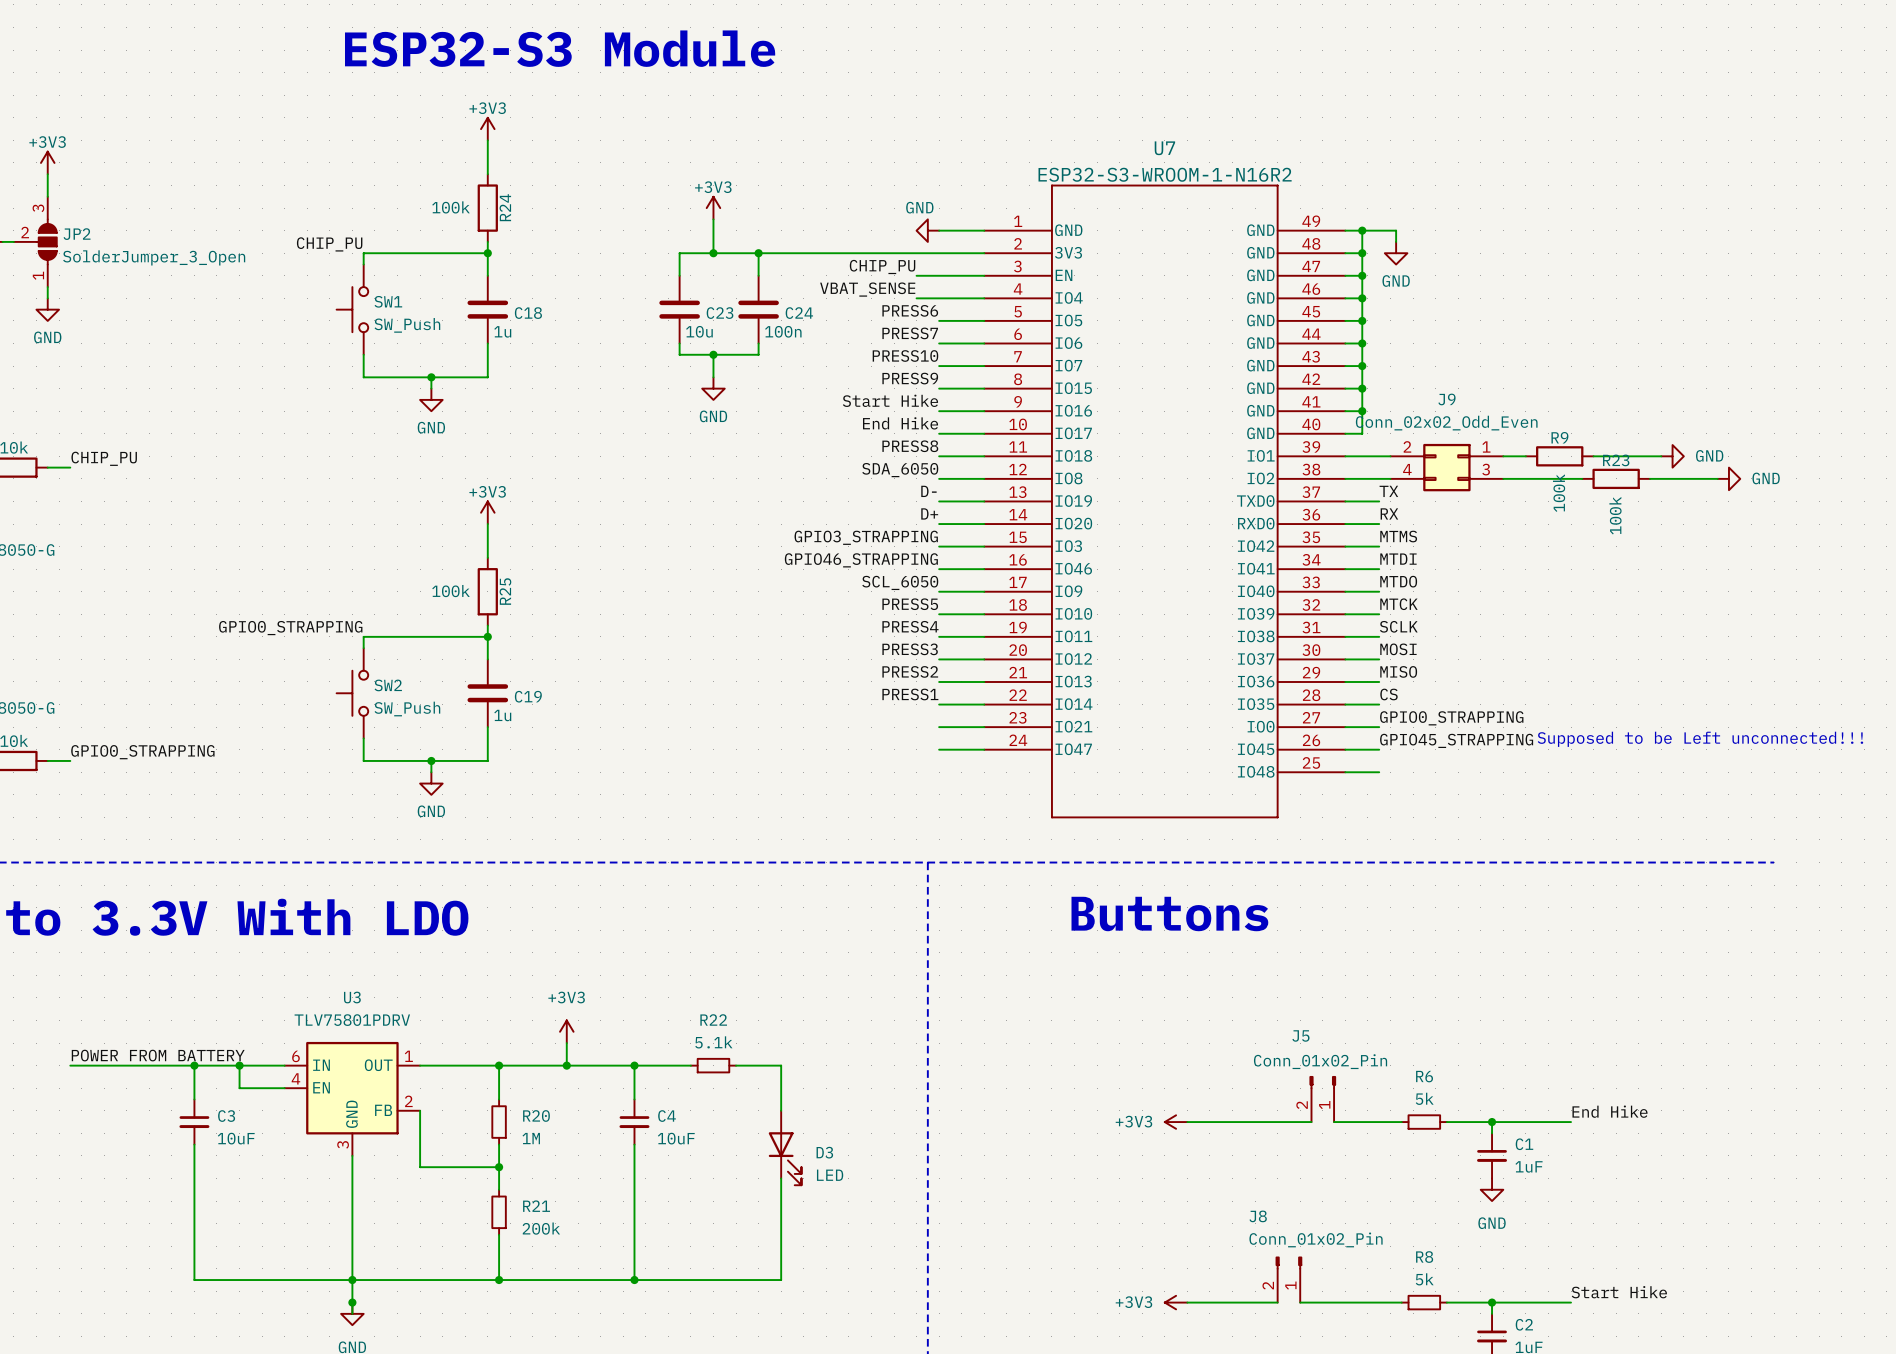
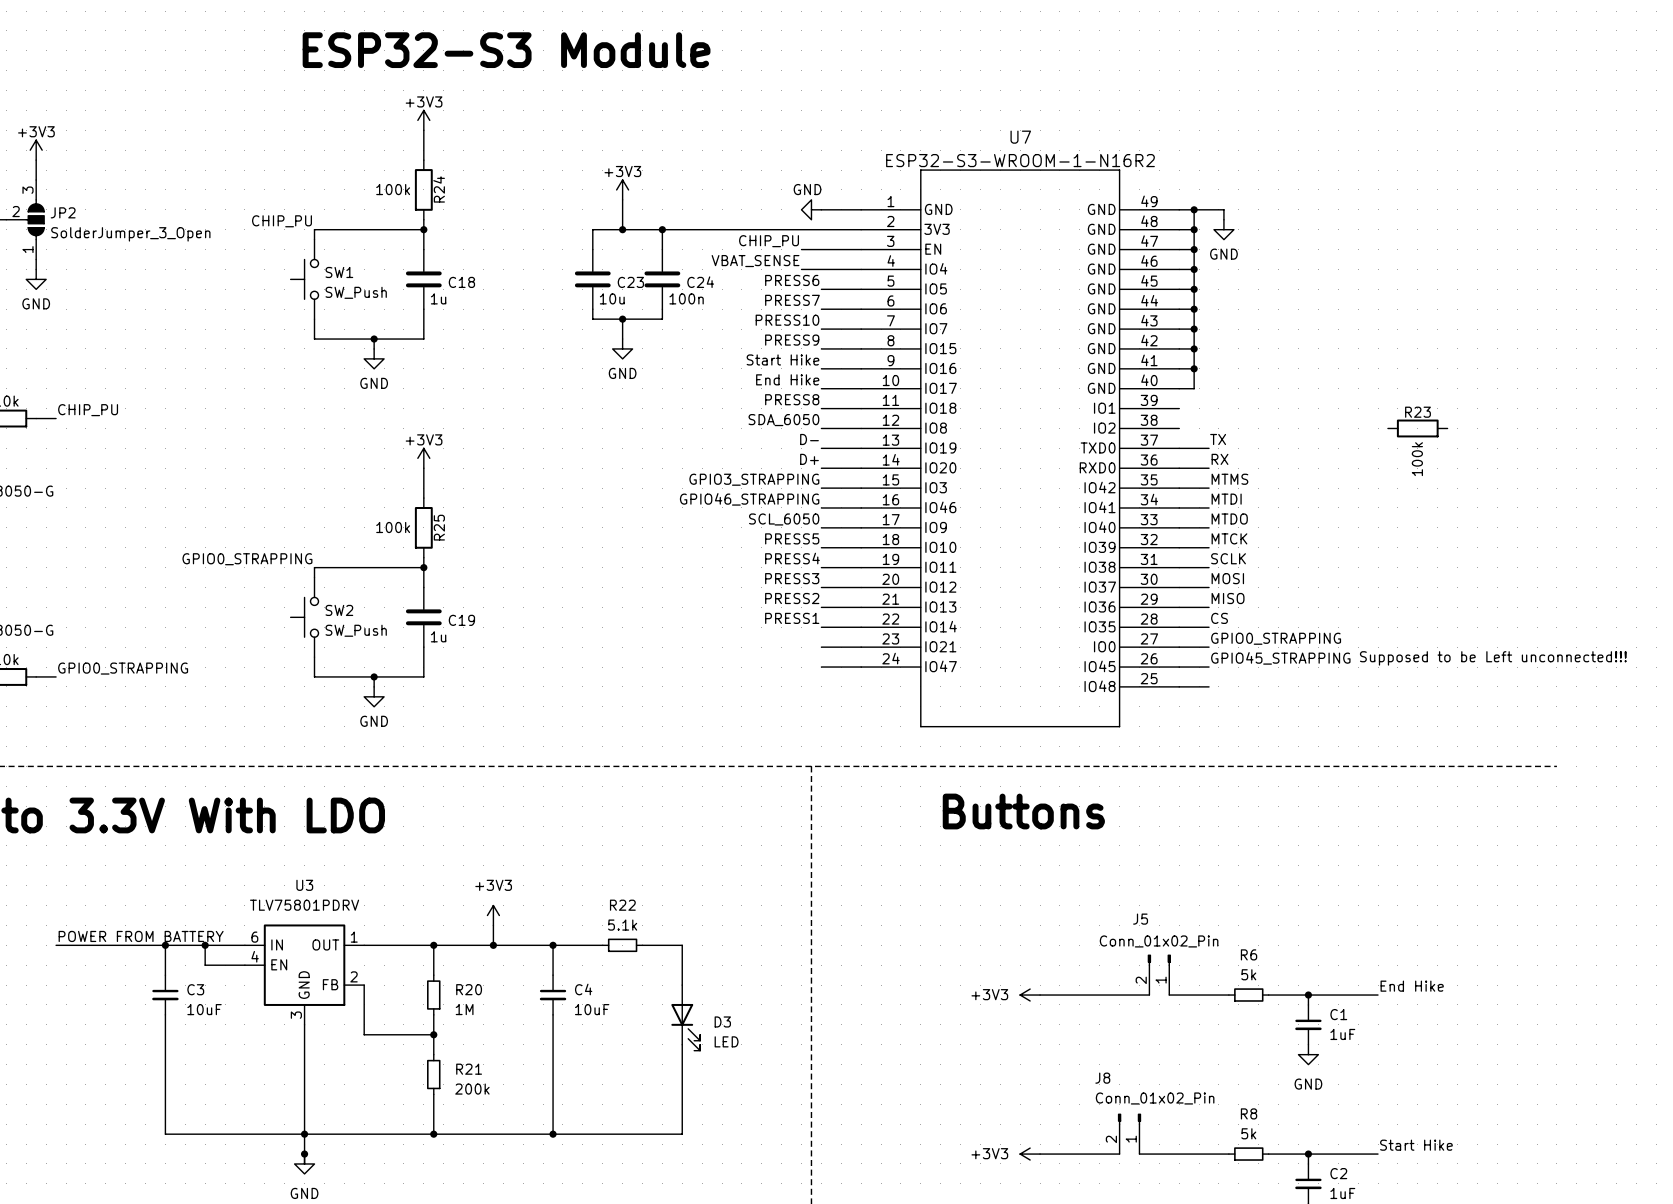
wire: (1345, 456) (1390, 456) -> none
wire: (1503, 456) (1525, 456) -> none
R9: 100k (1559, 456) -> none
wire: (1593, 456) (1661, 456) -> none
power symbol: GND (1672, 456) -> none
J9: Conn_02x02_Odd_Even (1446, 467) -> none
wire: (1345, 478) (1390, 478) -> none
wire: (1503, 478) (1582, 478) -> none
wire: (1649, 478) (1717, 478) -> none
power symbol: GND (1728, 478) -> none

